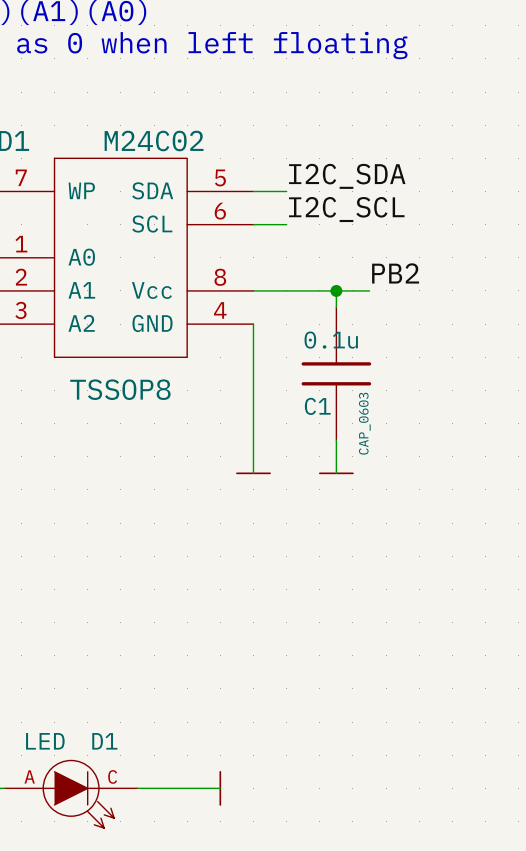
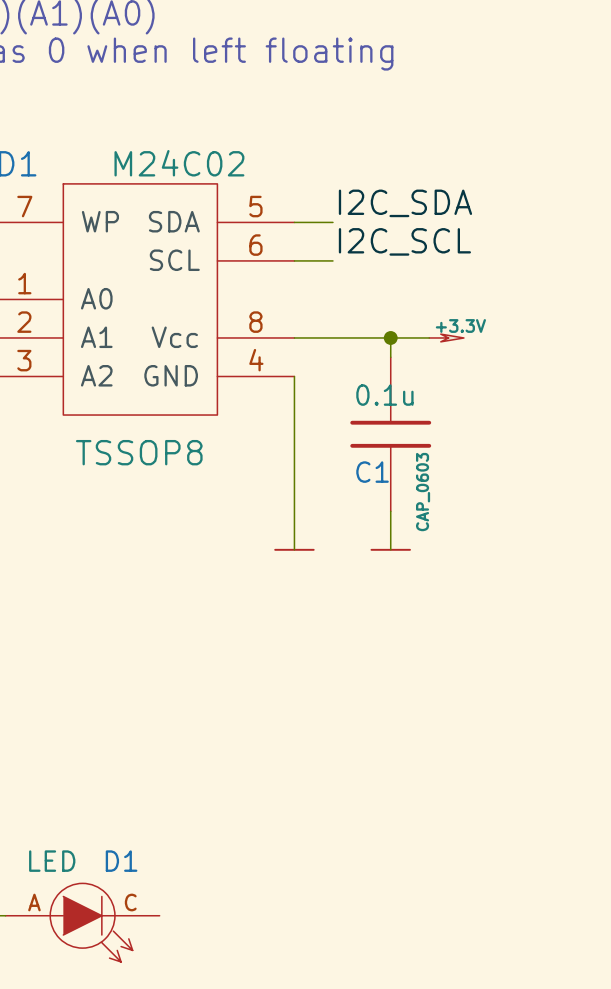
label: PB2 (395, 273) -> none
power symbol: none -> +3.3V (446, 337)
wire: (137, 788) (220, 788) -> none
power symbol: (220, 788) -> none

